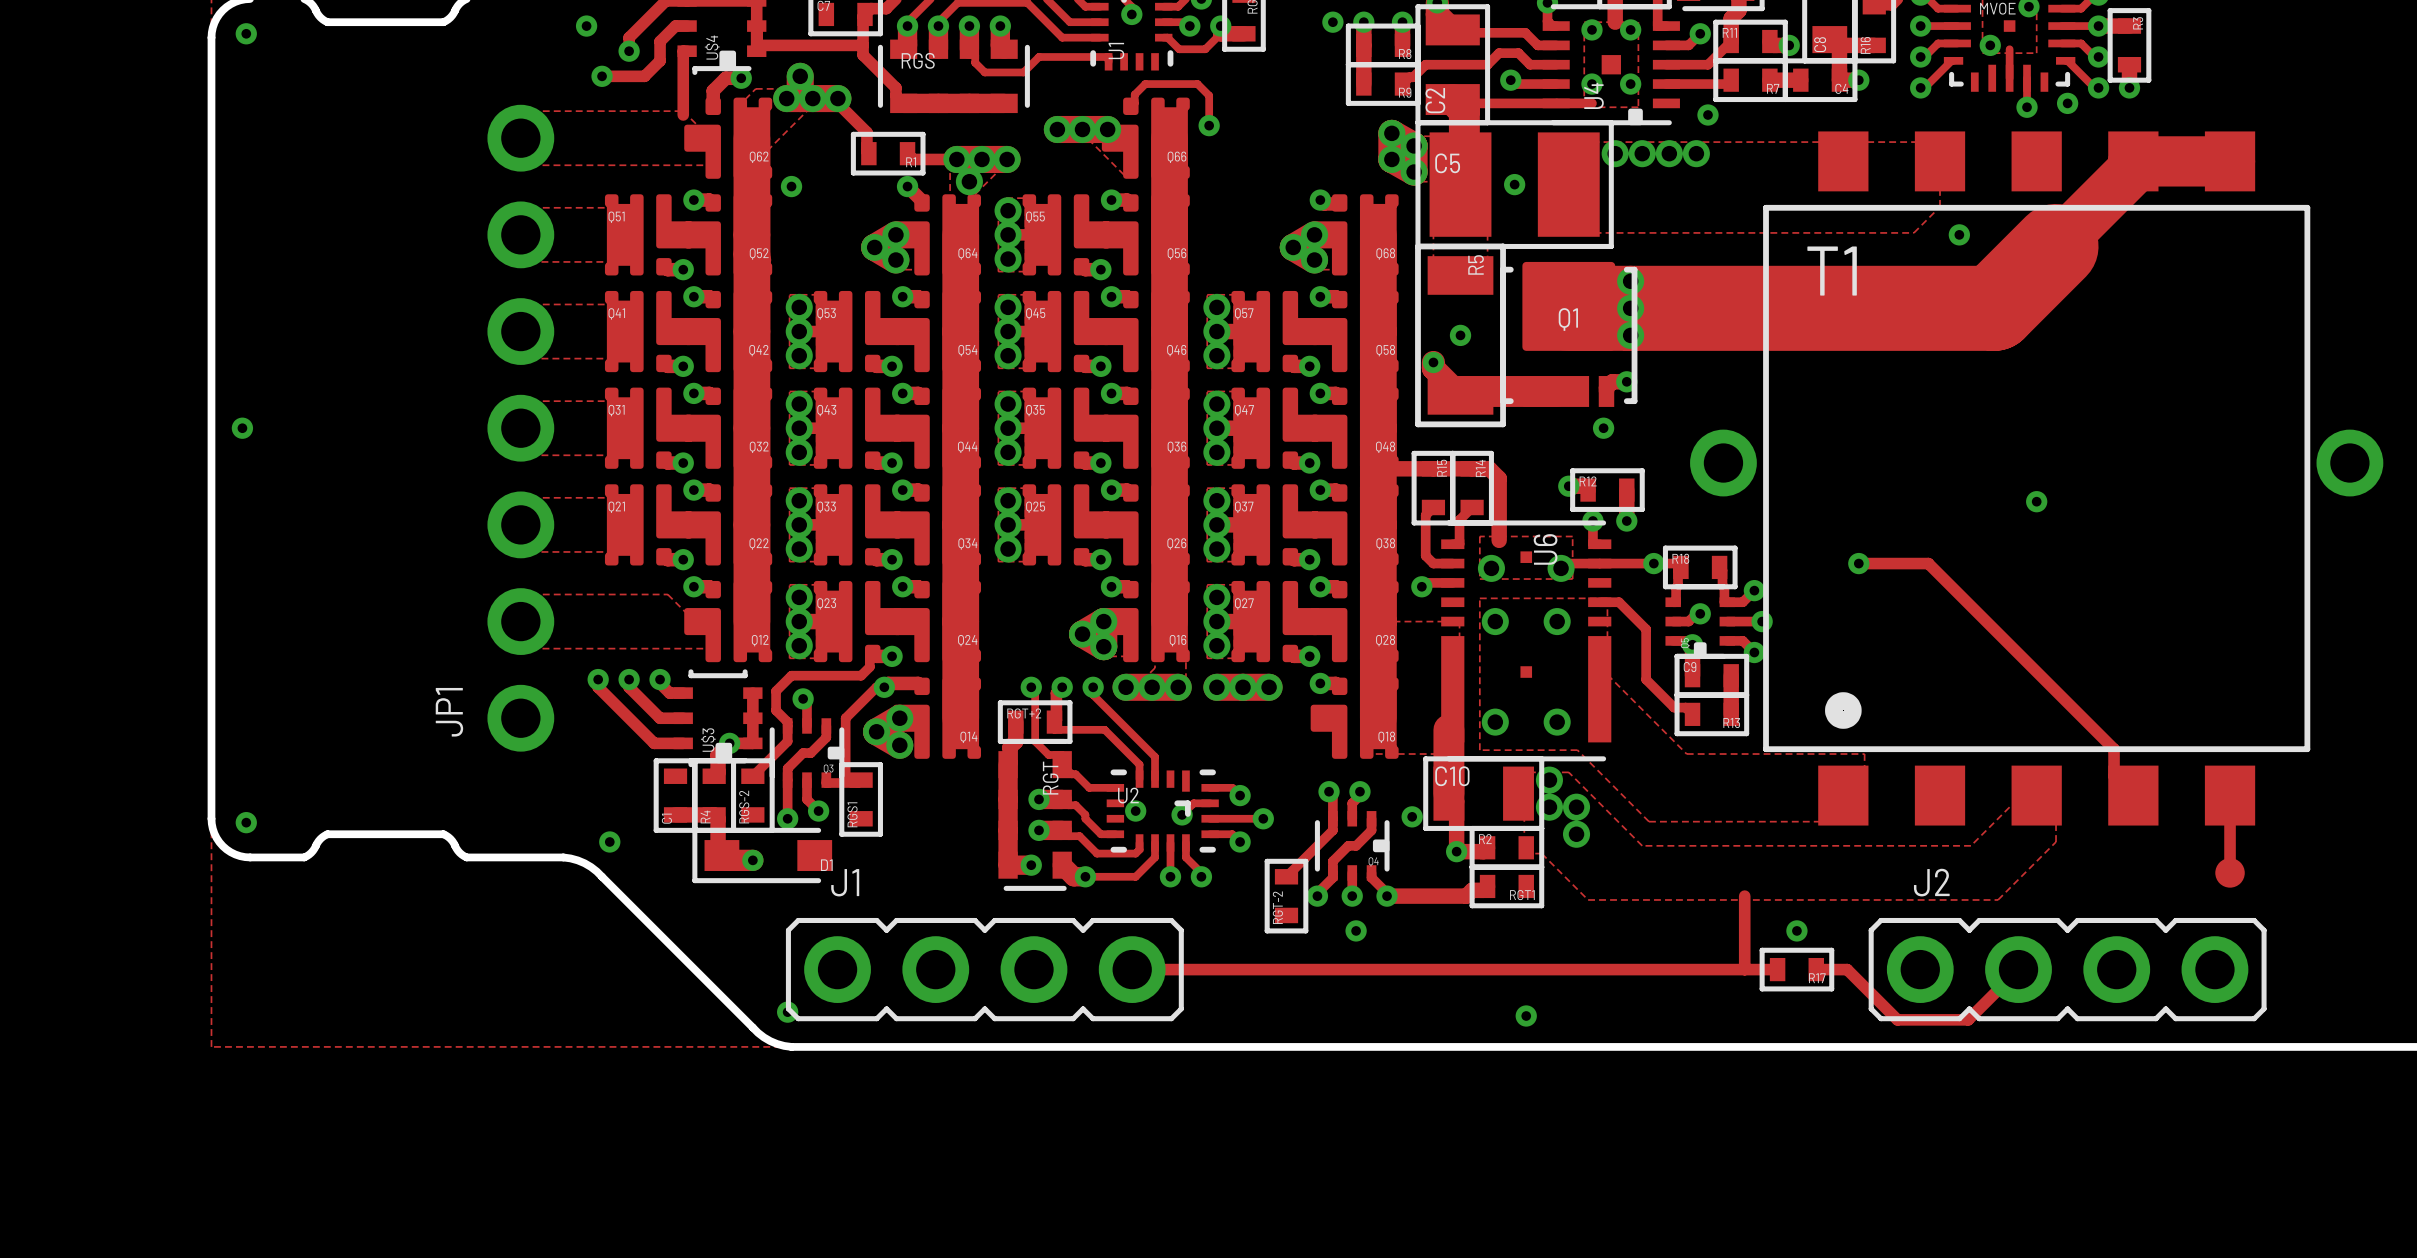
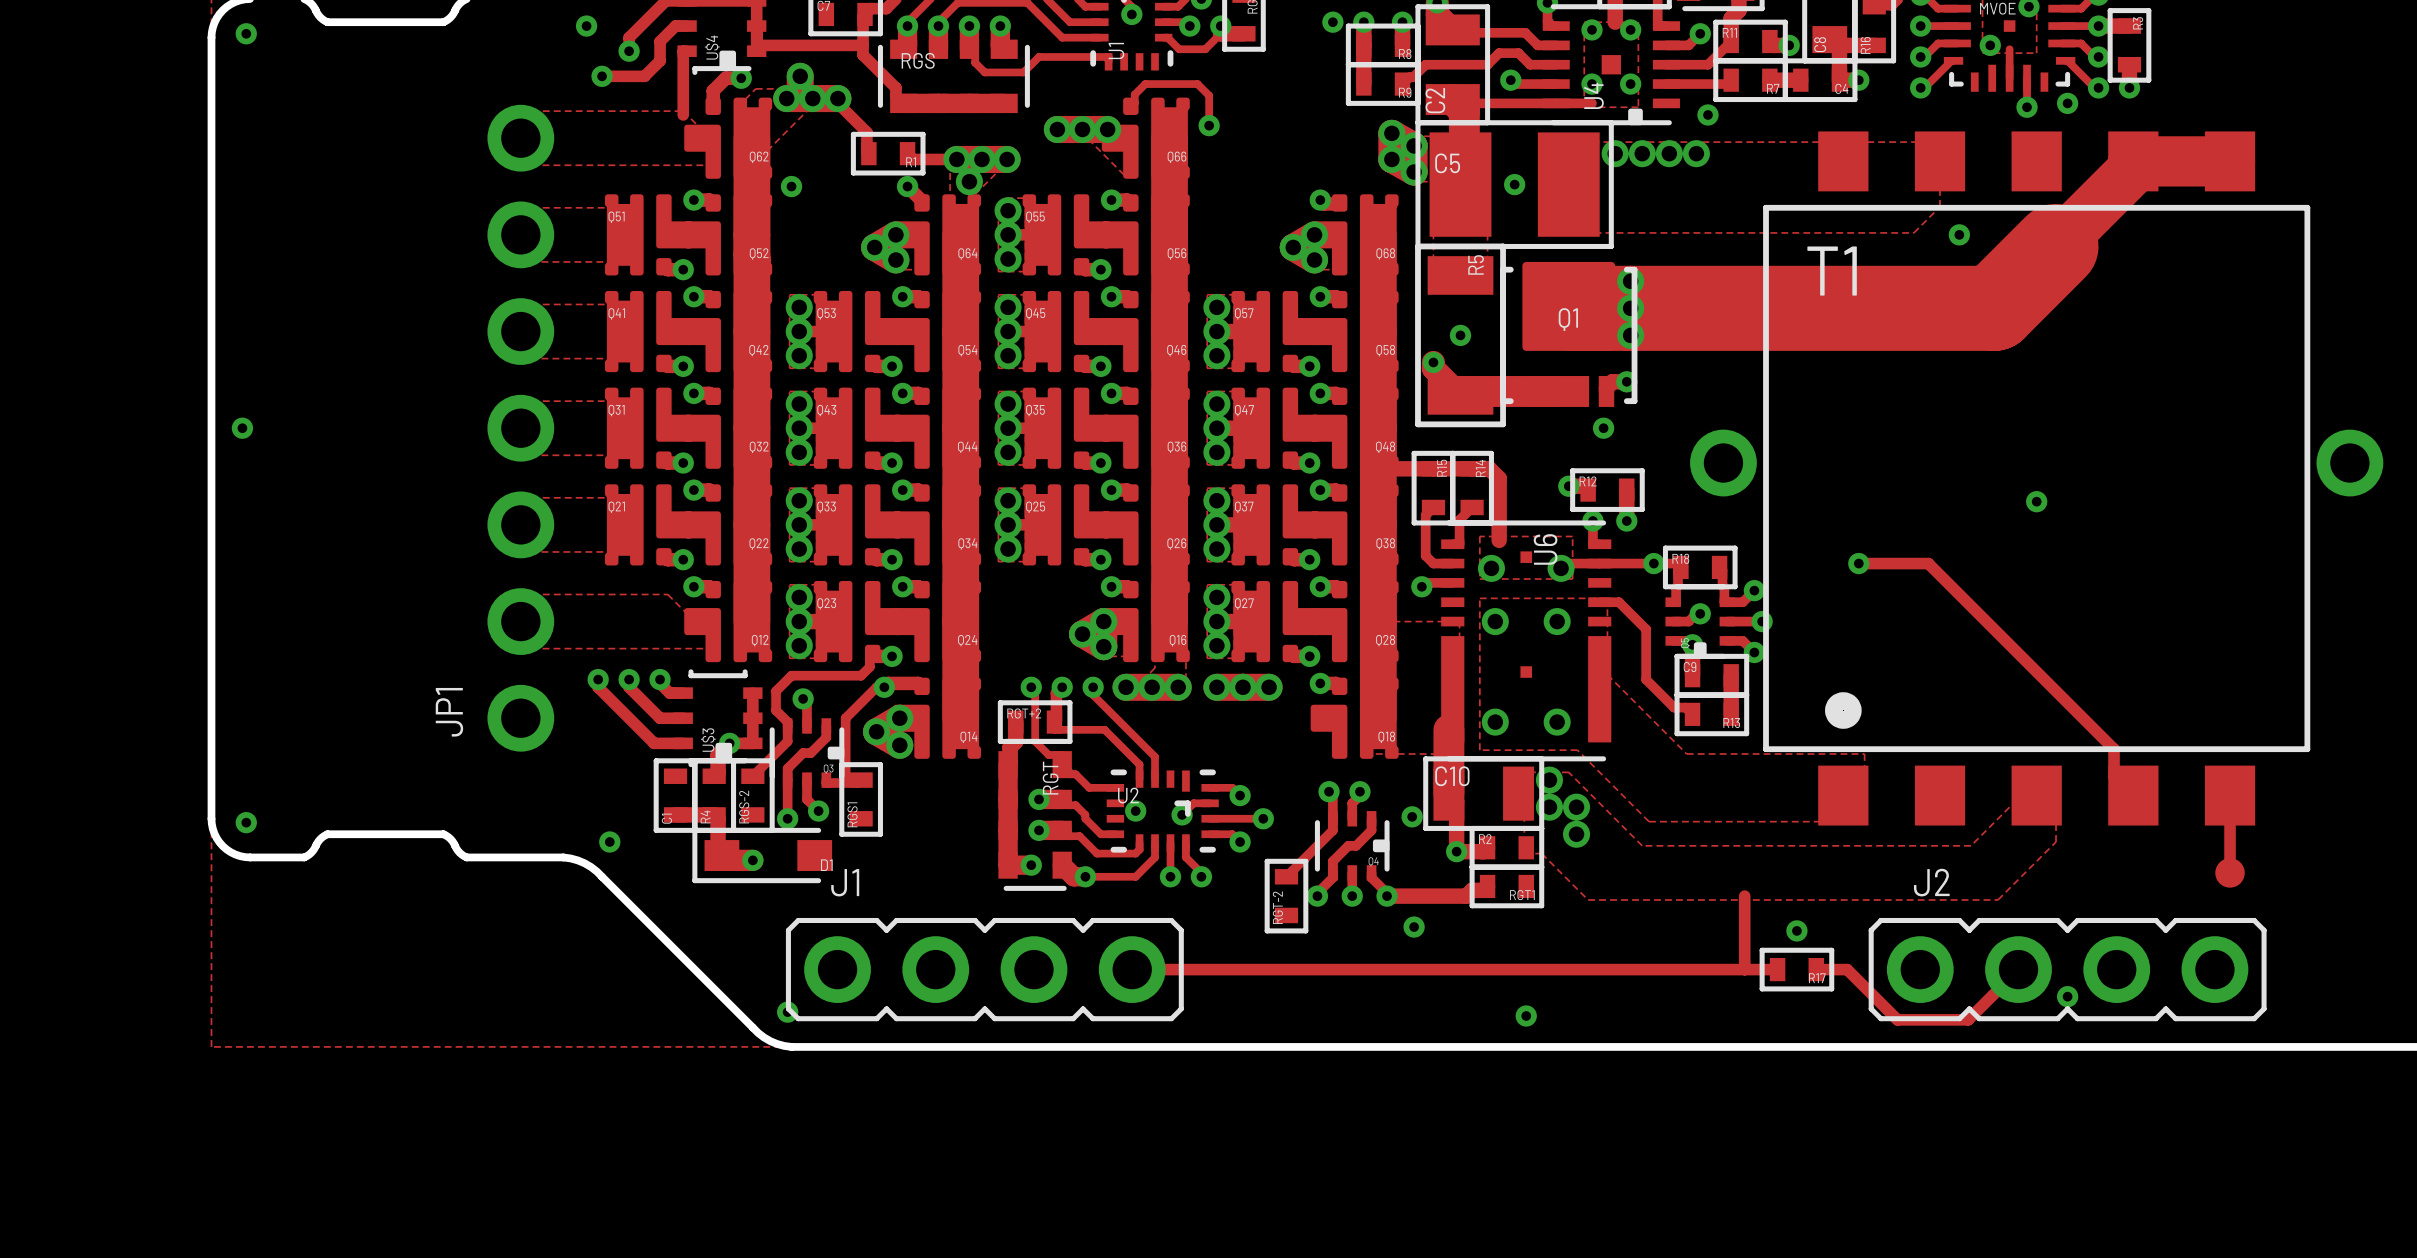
via position: (1356, 930) -> (1414, 927)
via: none -> (2067, 996)

